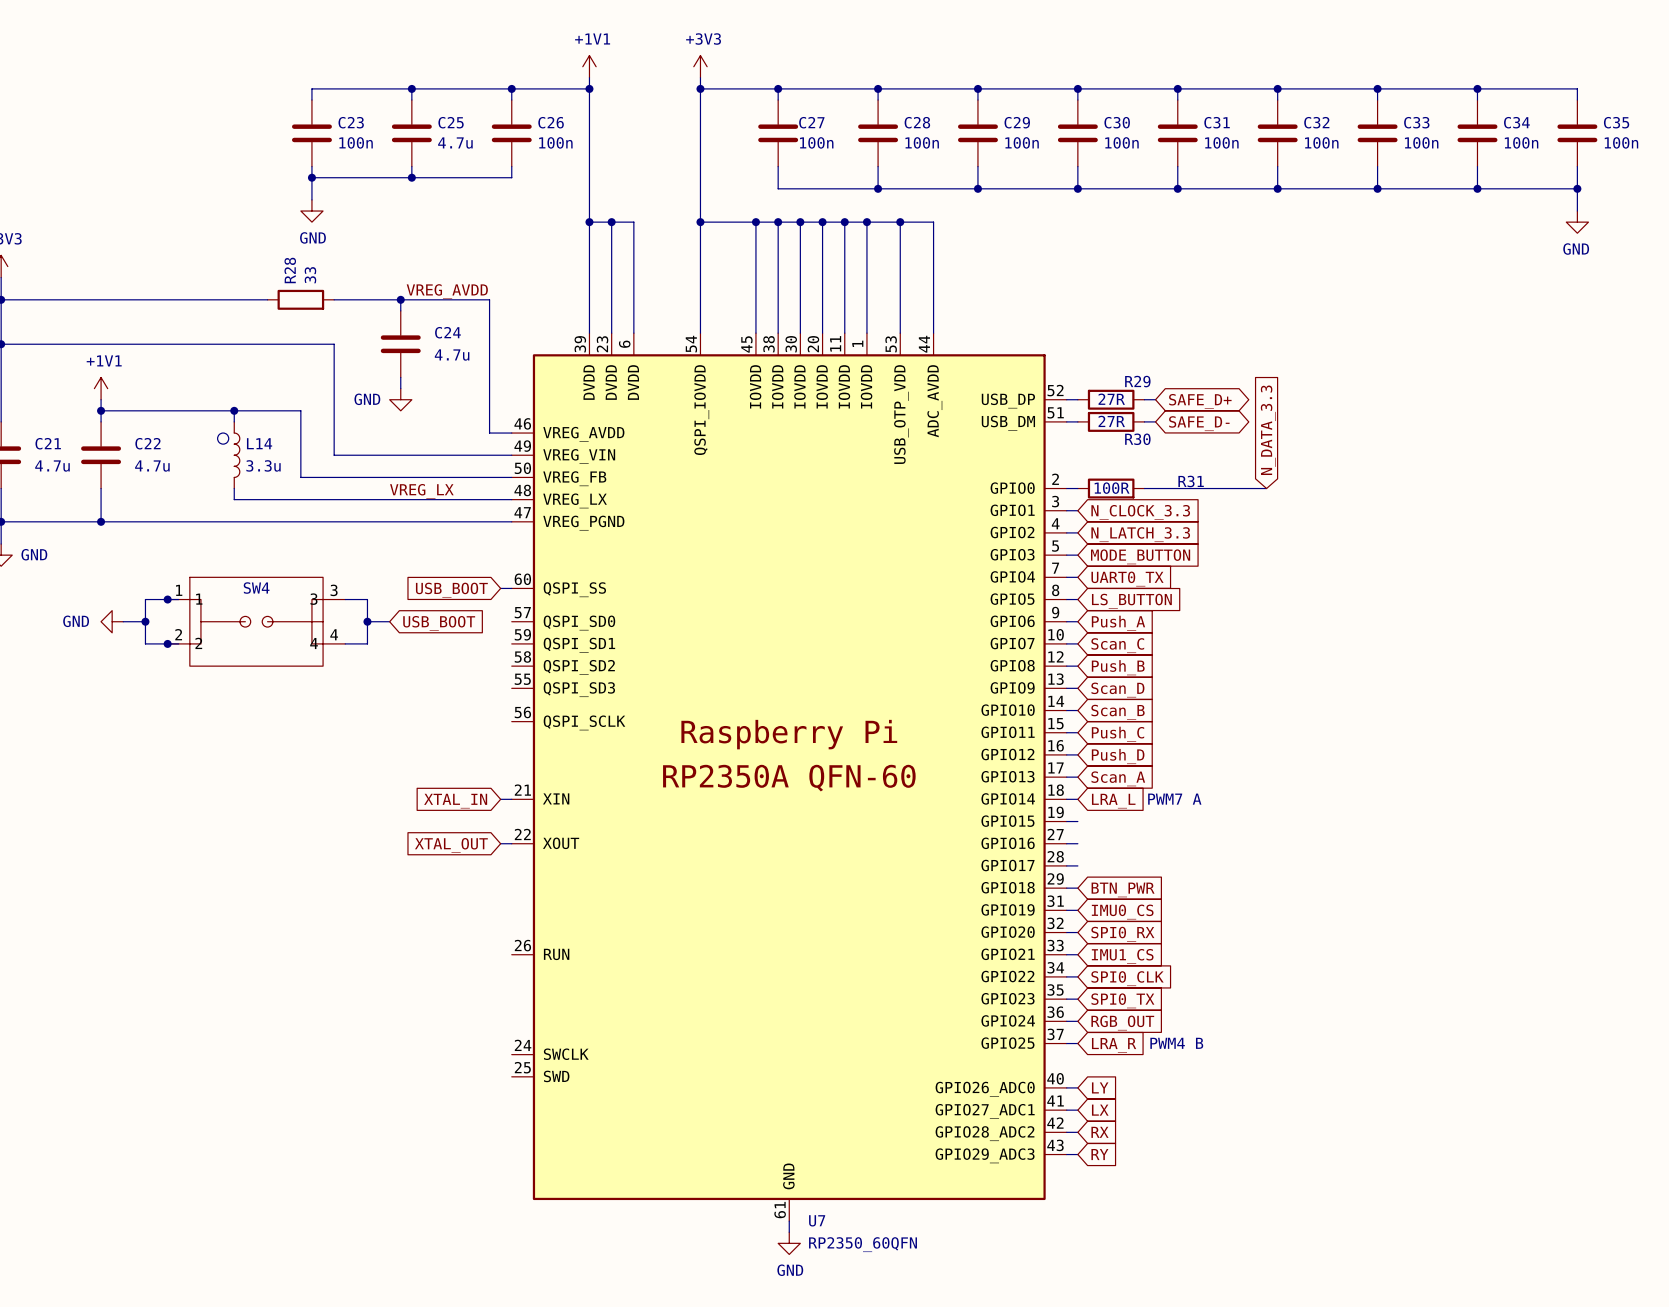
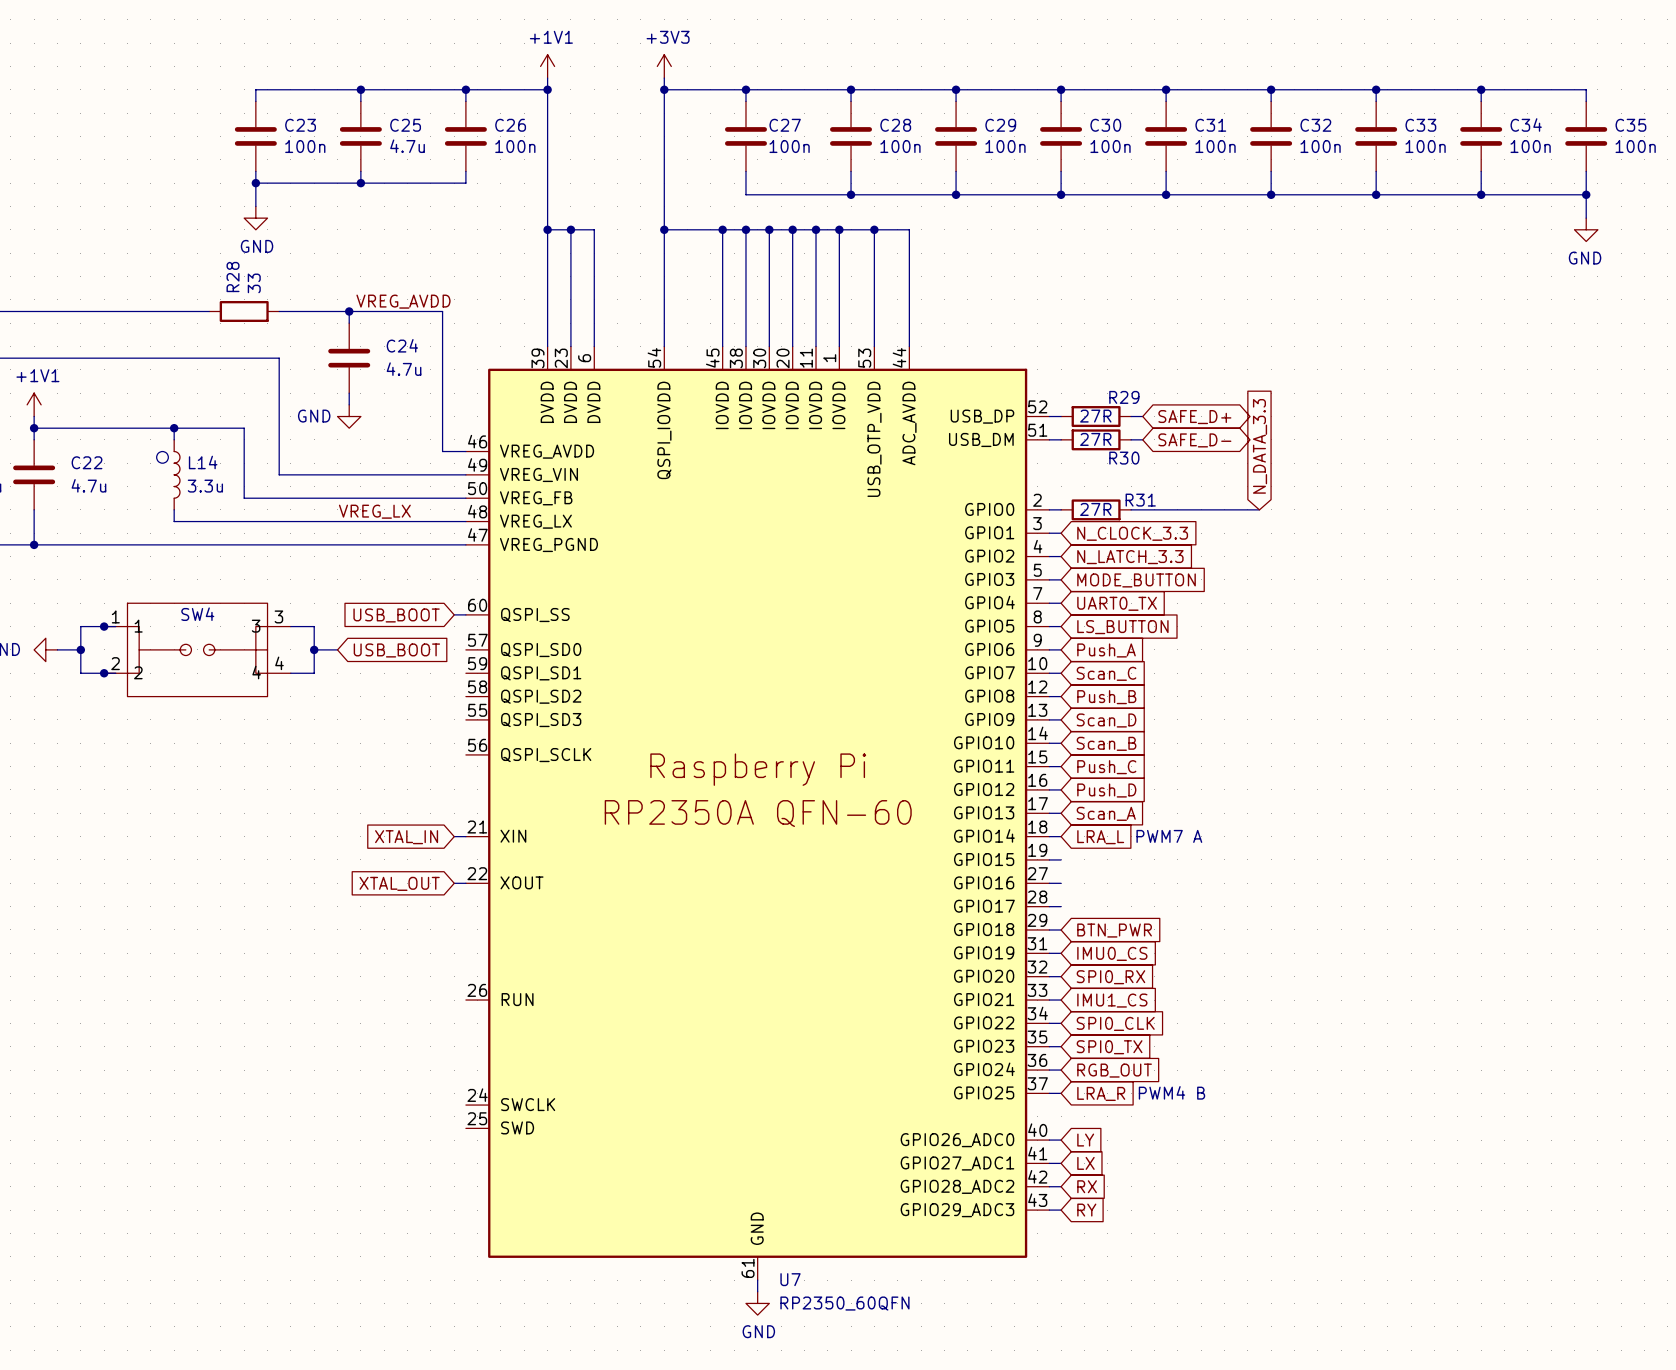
R31 name position: R31 (1191, 481) -> R31 (1140, 500)
R31 value: 100R (1112, 488) -> 27R (1095, 509)

